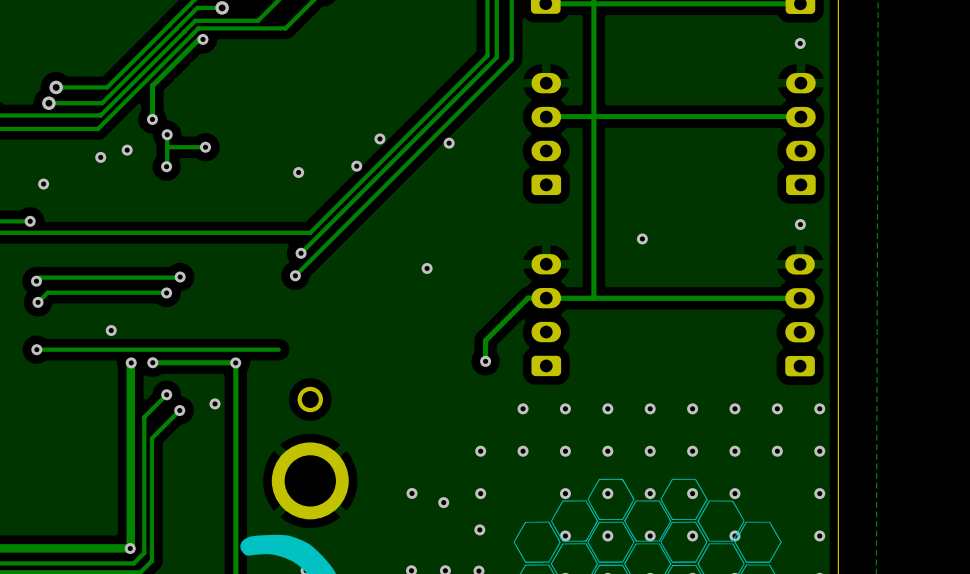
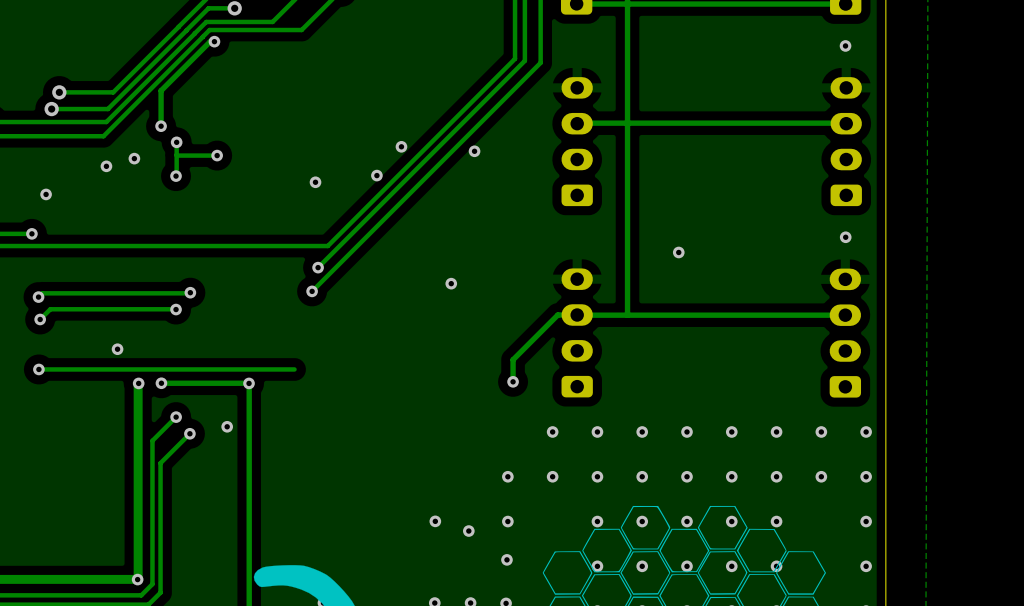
part: (310, 453) -> none

